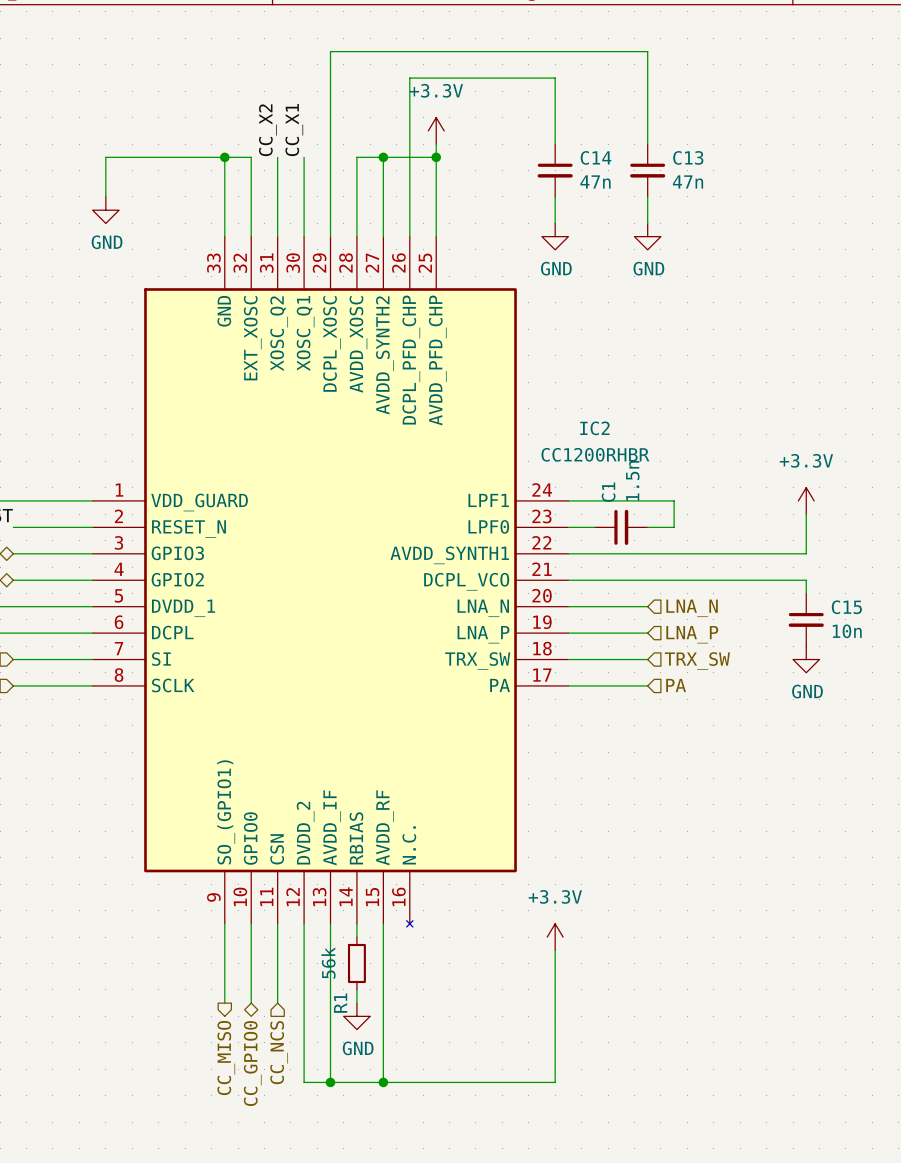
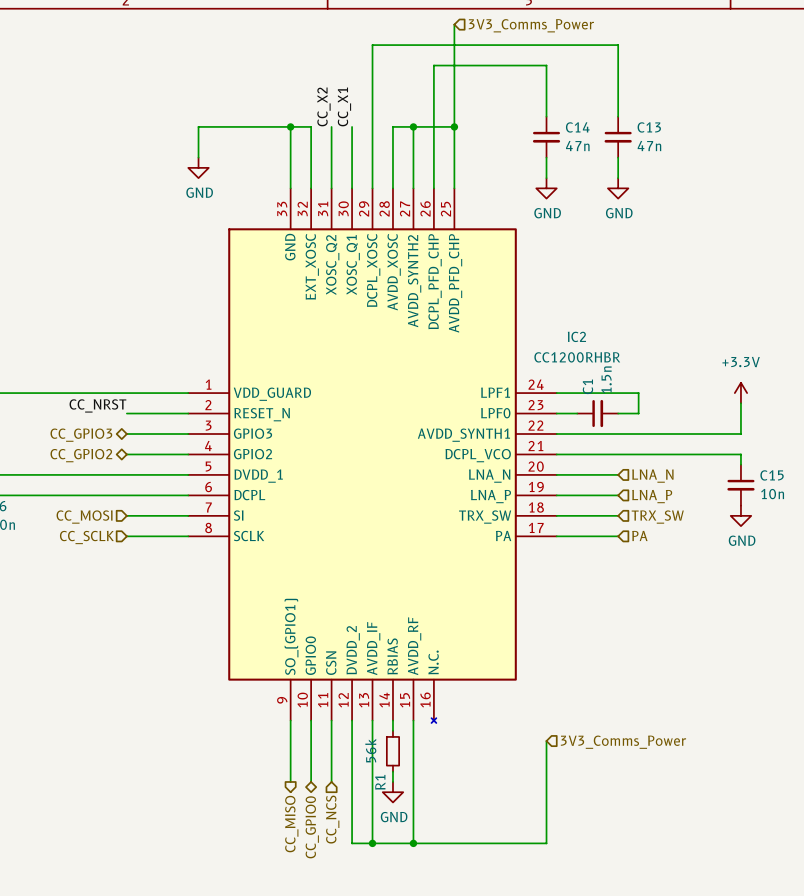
wire: none -> (454, 24) (454, 116)
hierarchical label: none -> 3V3_Comms_Power (531, 25)
power symbol: +3.3V (436, 130) -> none
power symbol: +3.3V (555, 937) -> none
hierarchical label: none -> 3V3_Comms_Power (623, 742)

